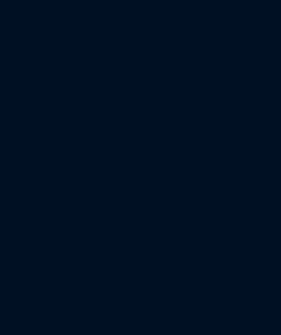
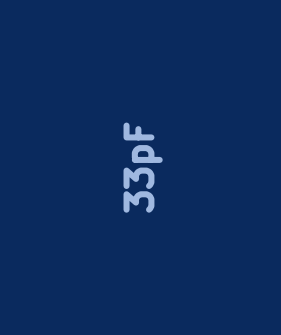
part: none -> 33pF (143, 167)

